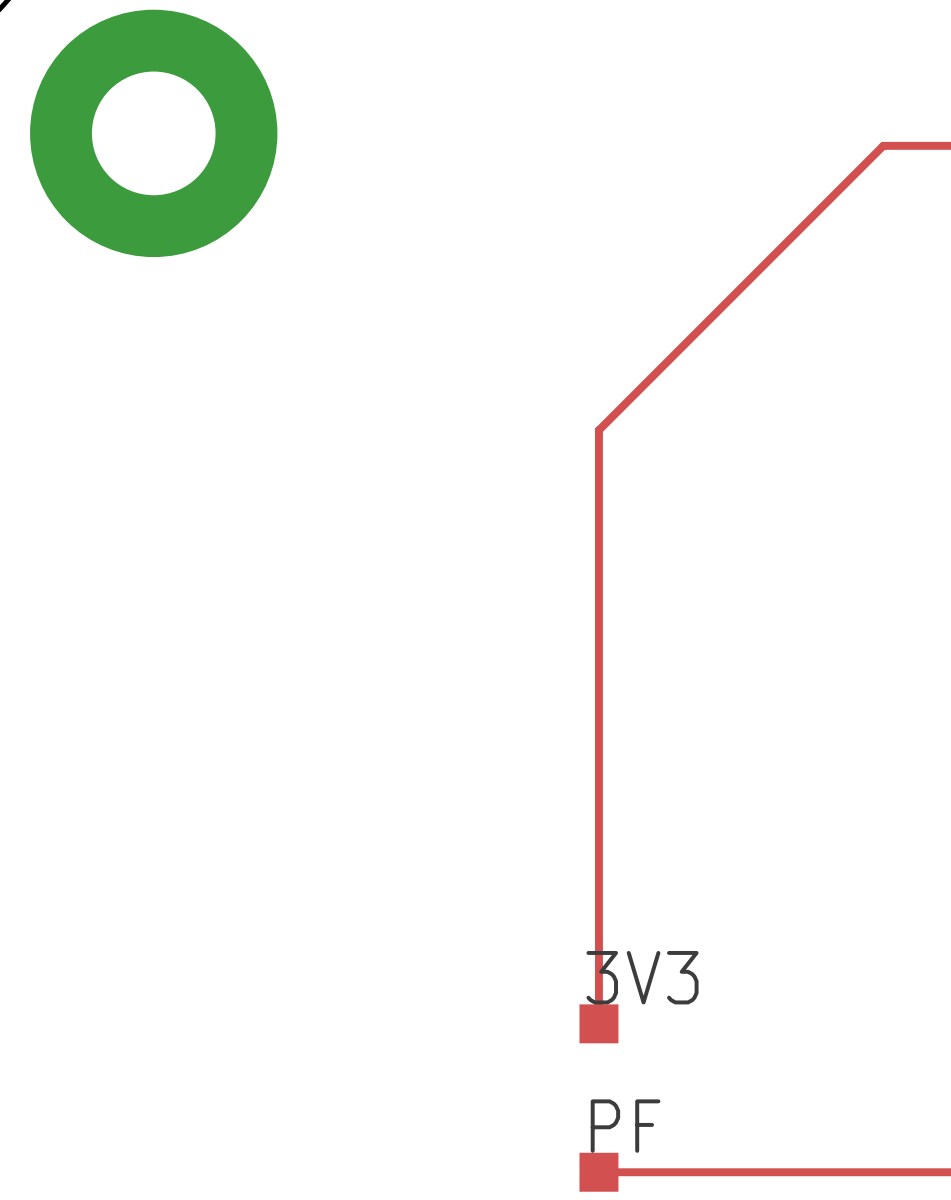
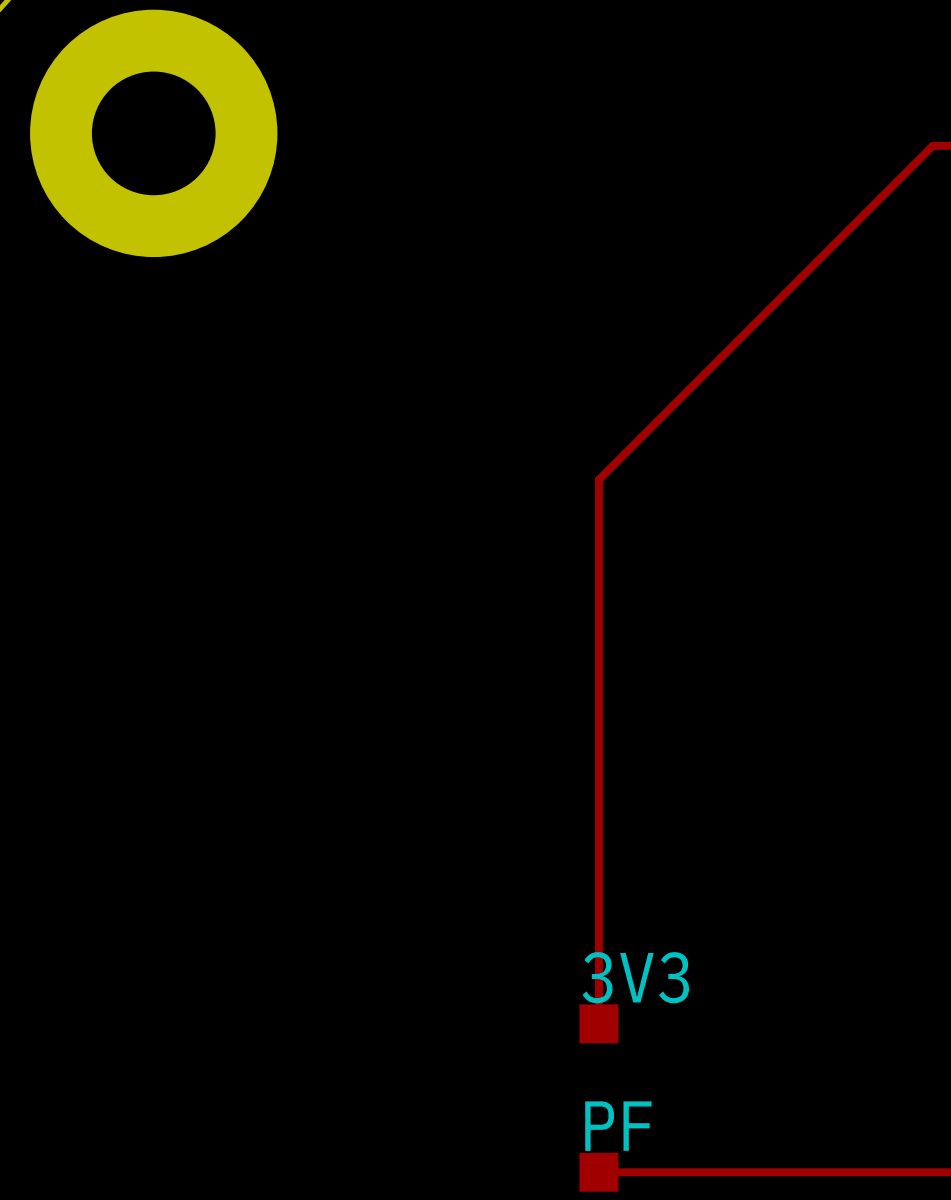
top track: (932, 145) (883, 145) (598, 430) (598, 479) -> (932, 145) (598, 479)

